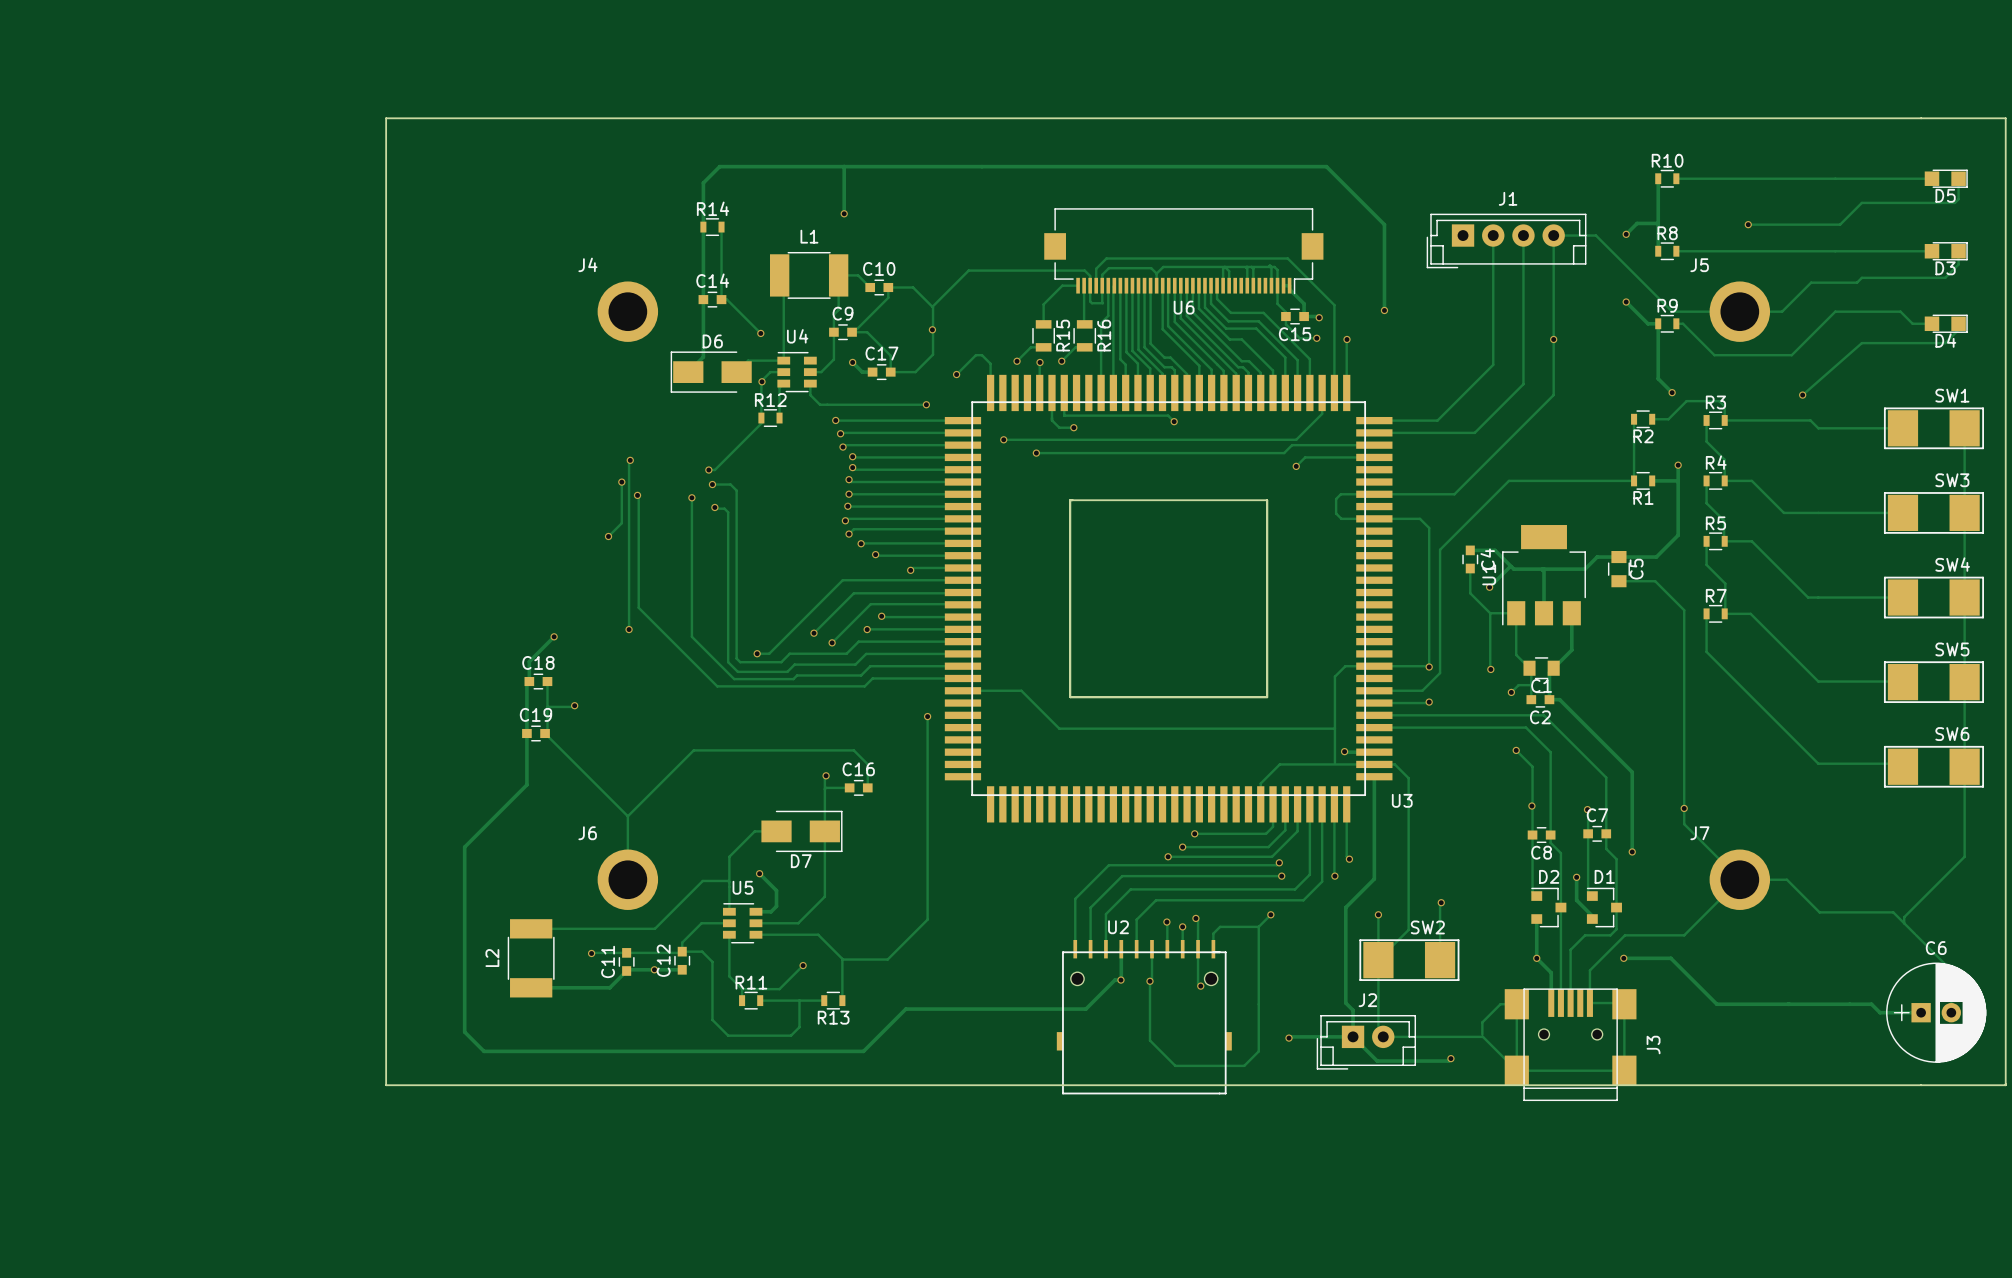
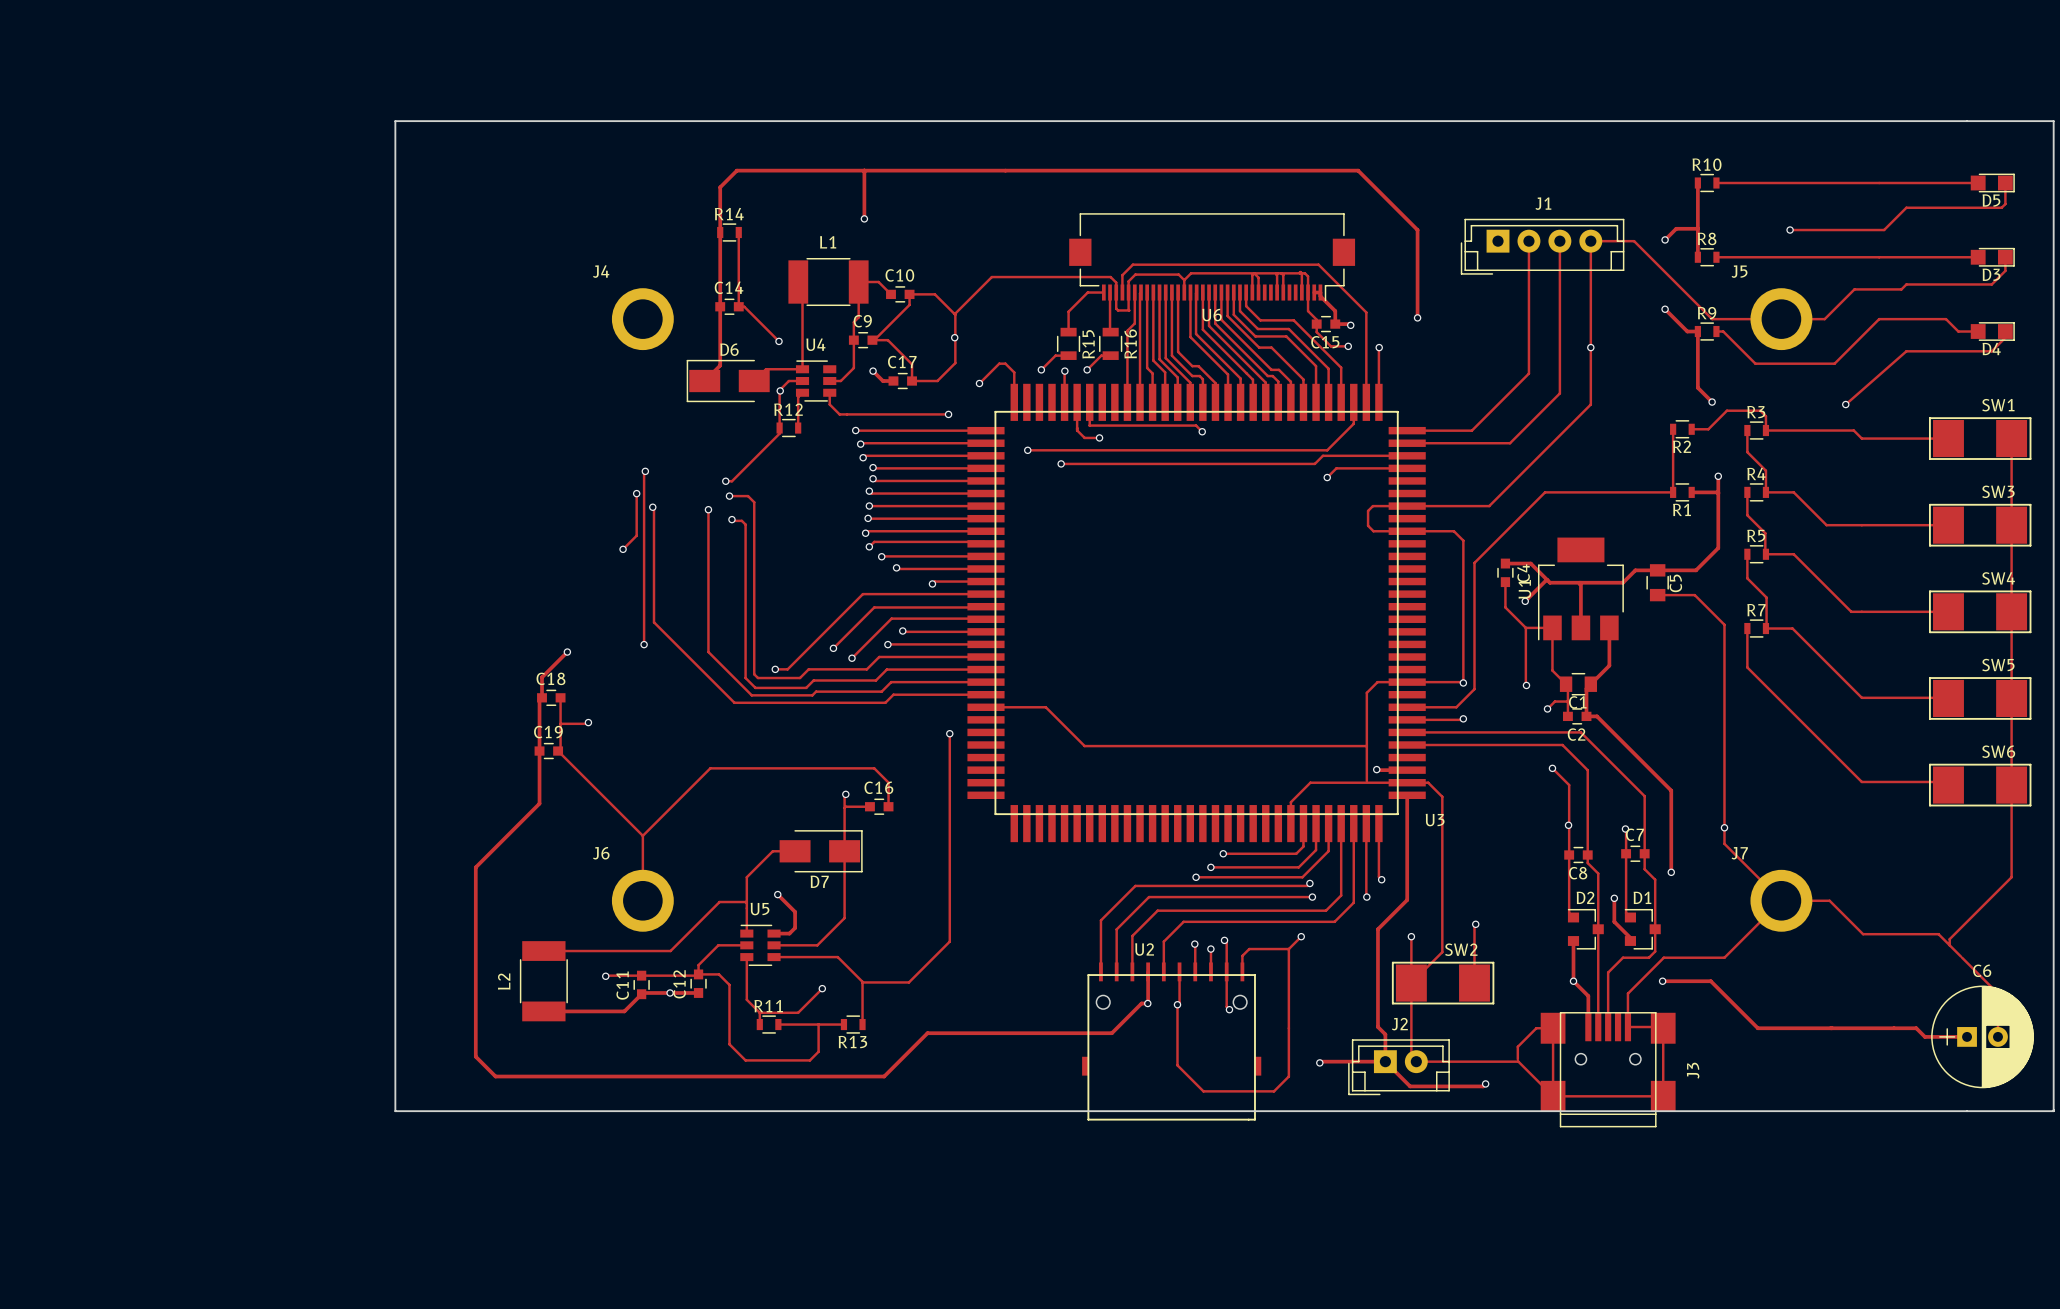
board edge: (1070, 500) (1267, 500) (1267, 697) (1070, 697) (1070, 500) -> none

